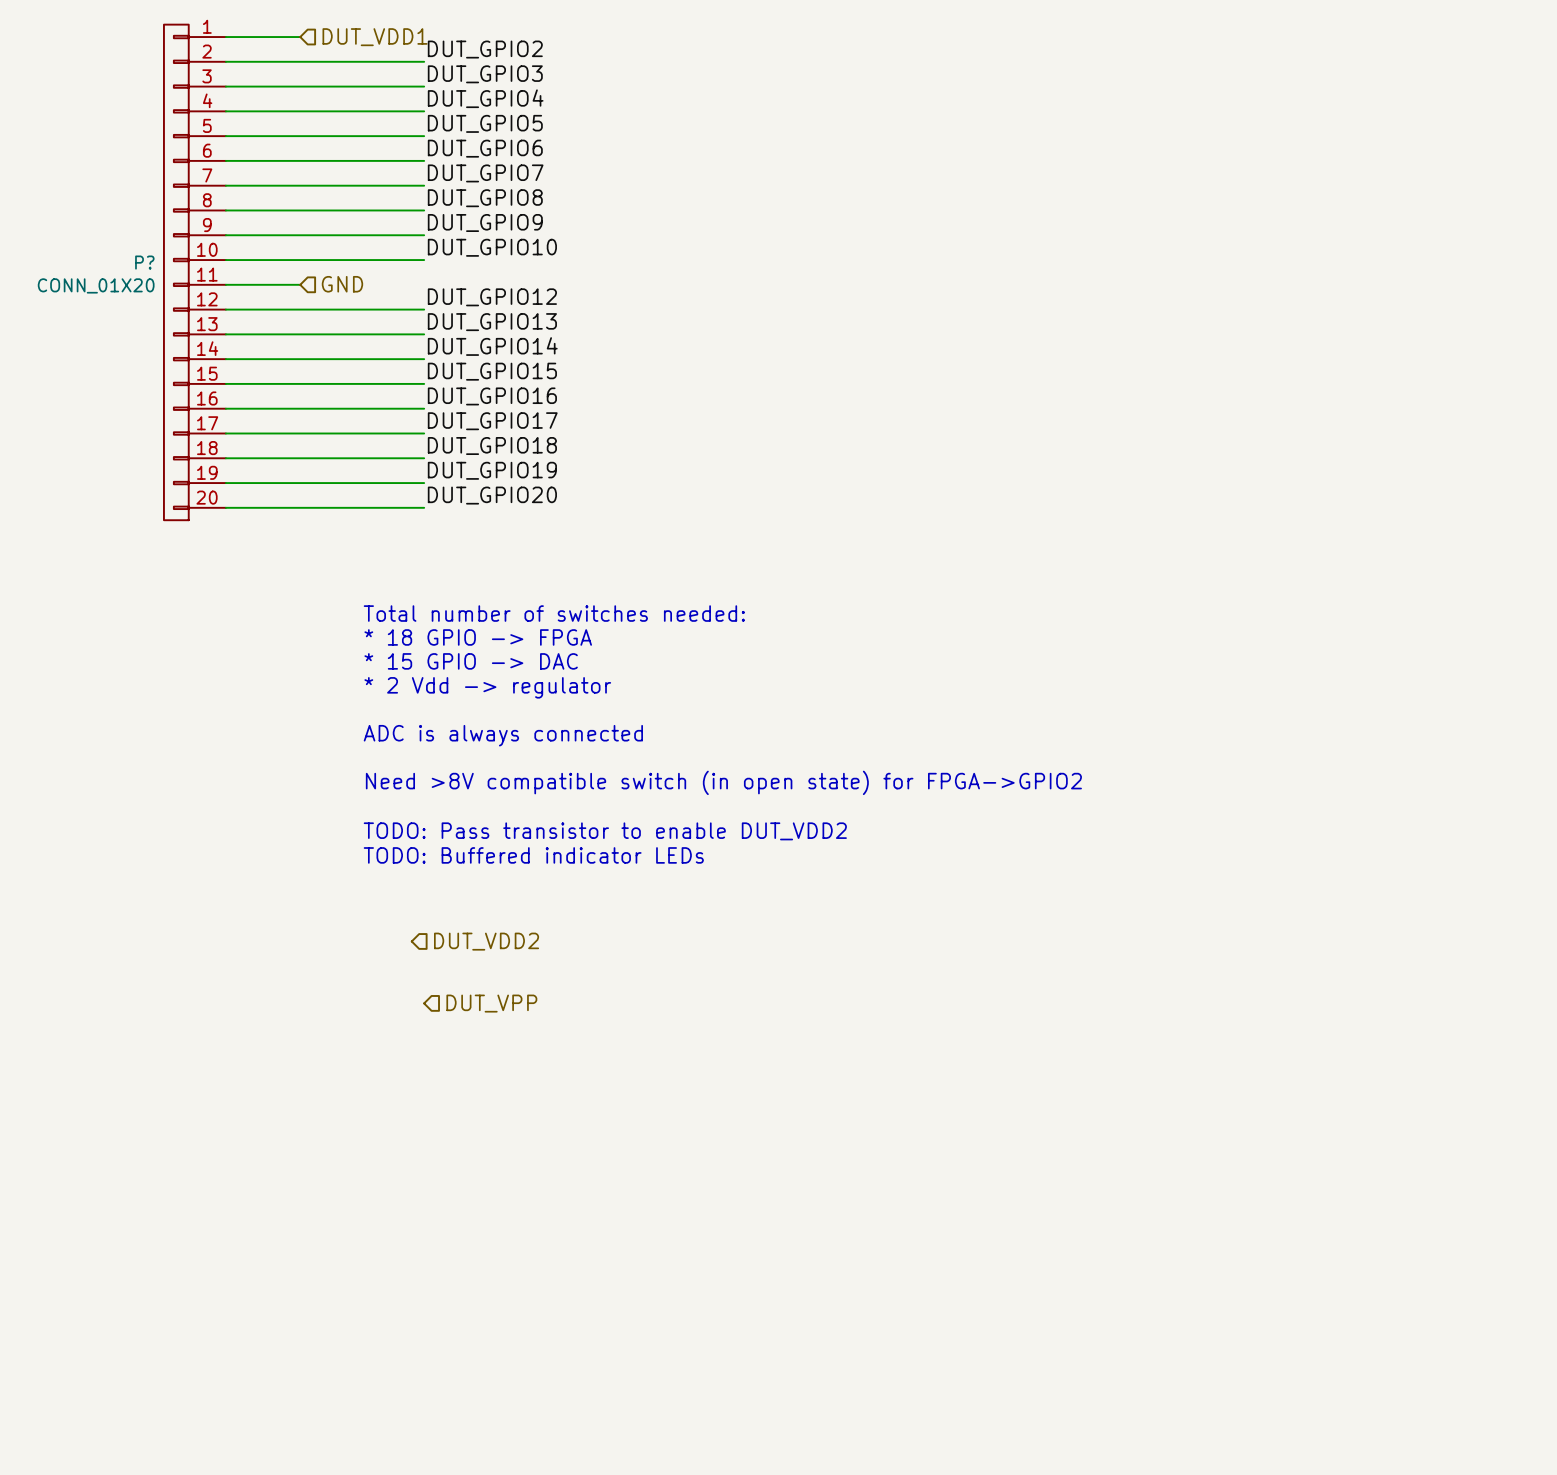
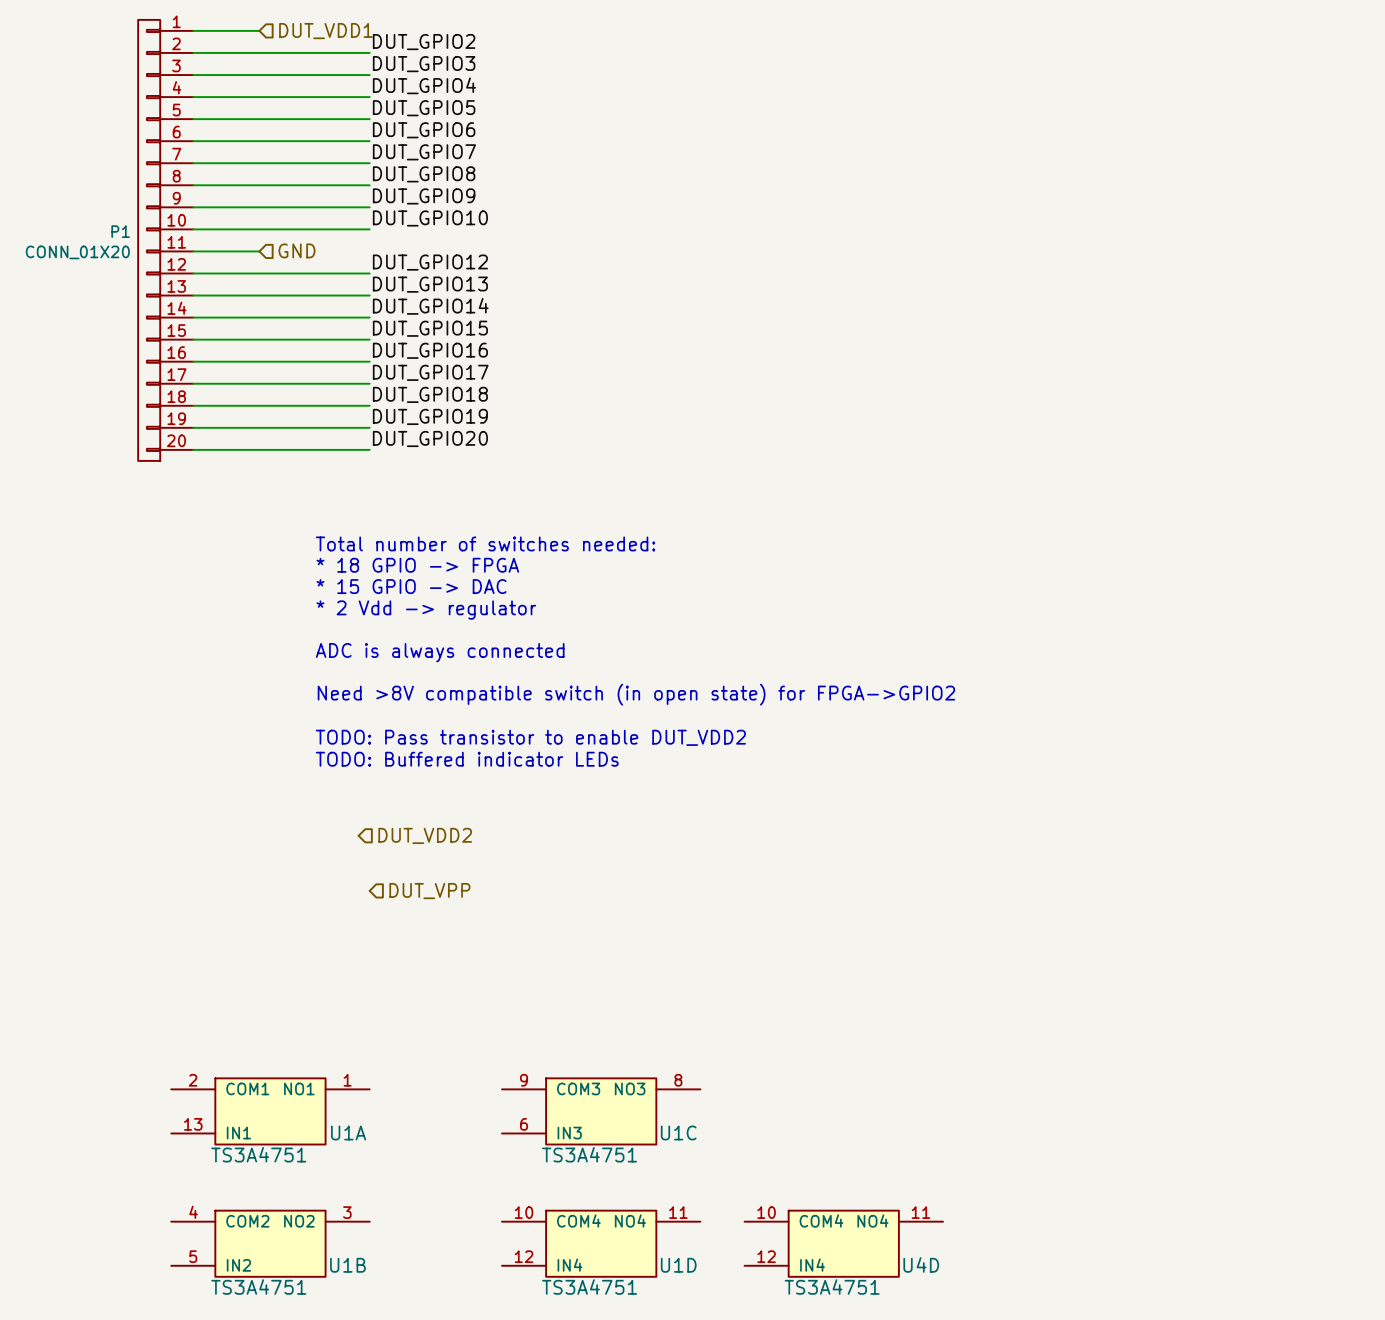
P? name: P? (144, 262) -> P1 (120, 231)
U1A: none -> TS3A4751 (270, 1111)
U1C: none -> TS3A4751 (601, 1111)
U1B: none -> TS3A4751 (270, 1243)
U1D: none -> TS3A4751 (601, 1243)
U4D: none -> TS3A4751 (843, 1243)

